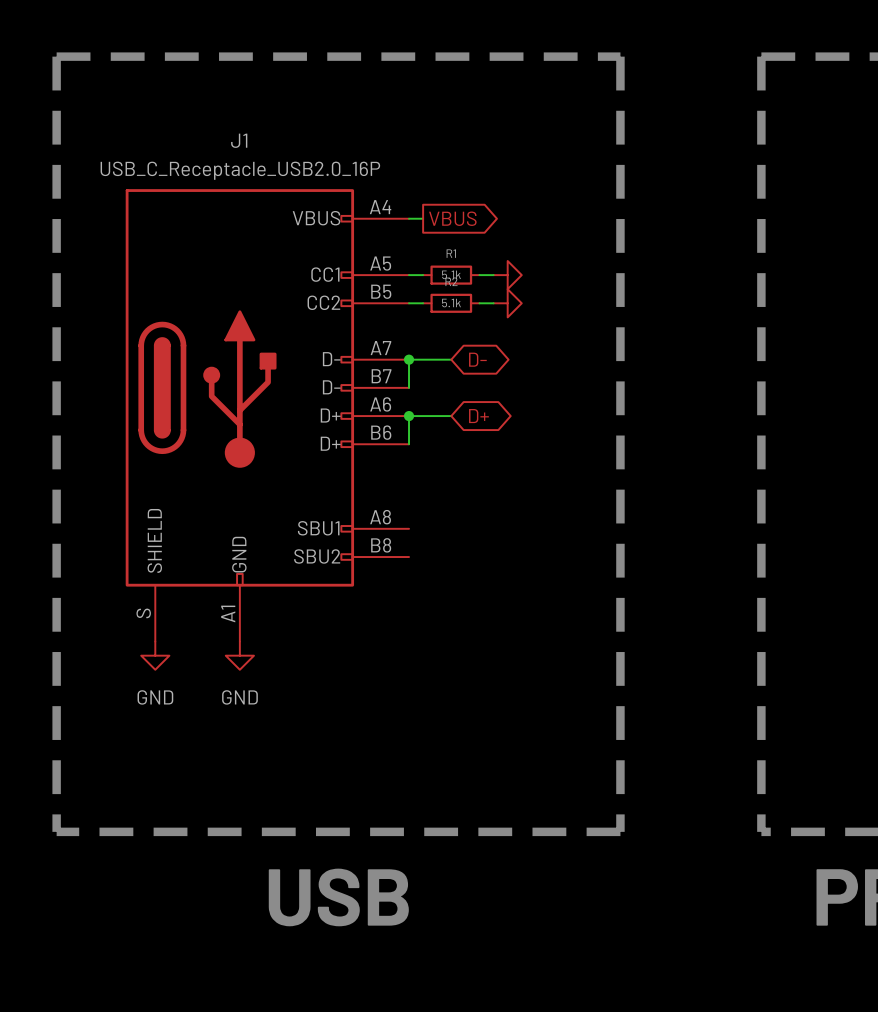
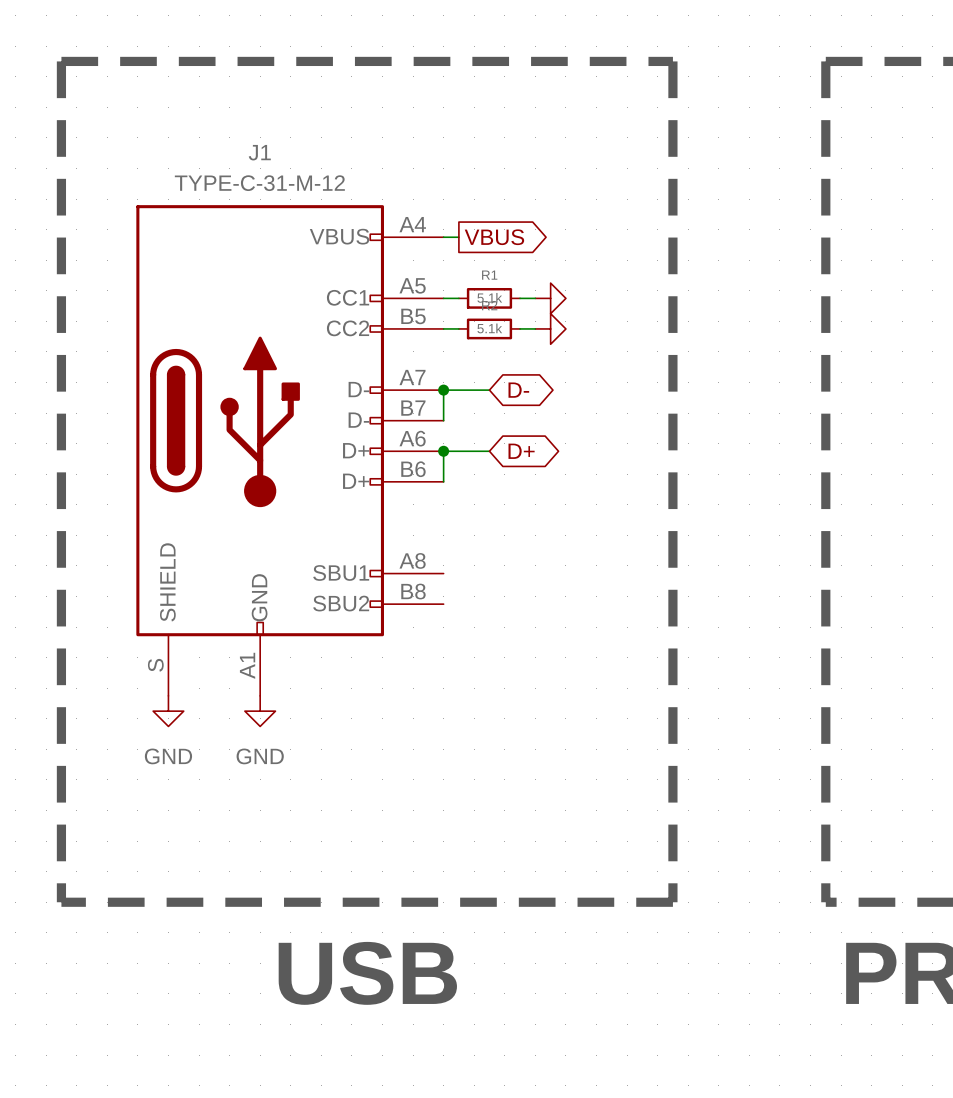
J1 value: USB_C_Receptacle_USB2.0_16P (240, 170) -> TYPE-C-31-M-12 (259, 183)

